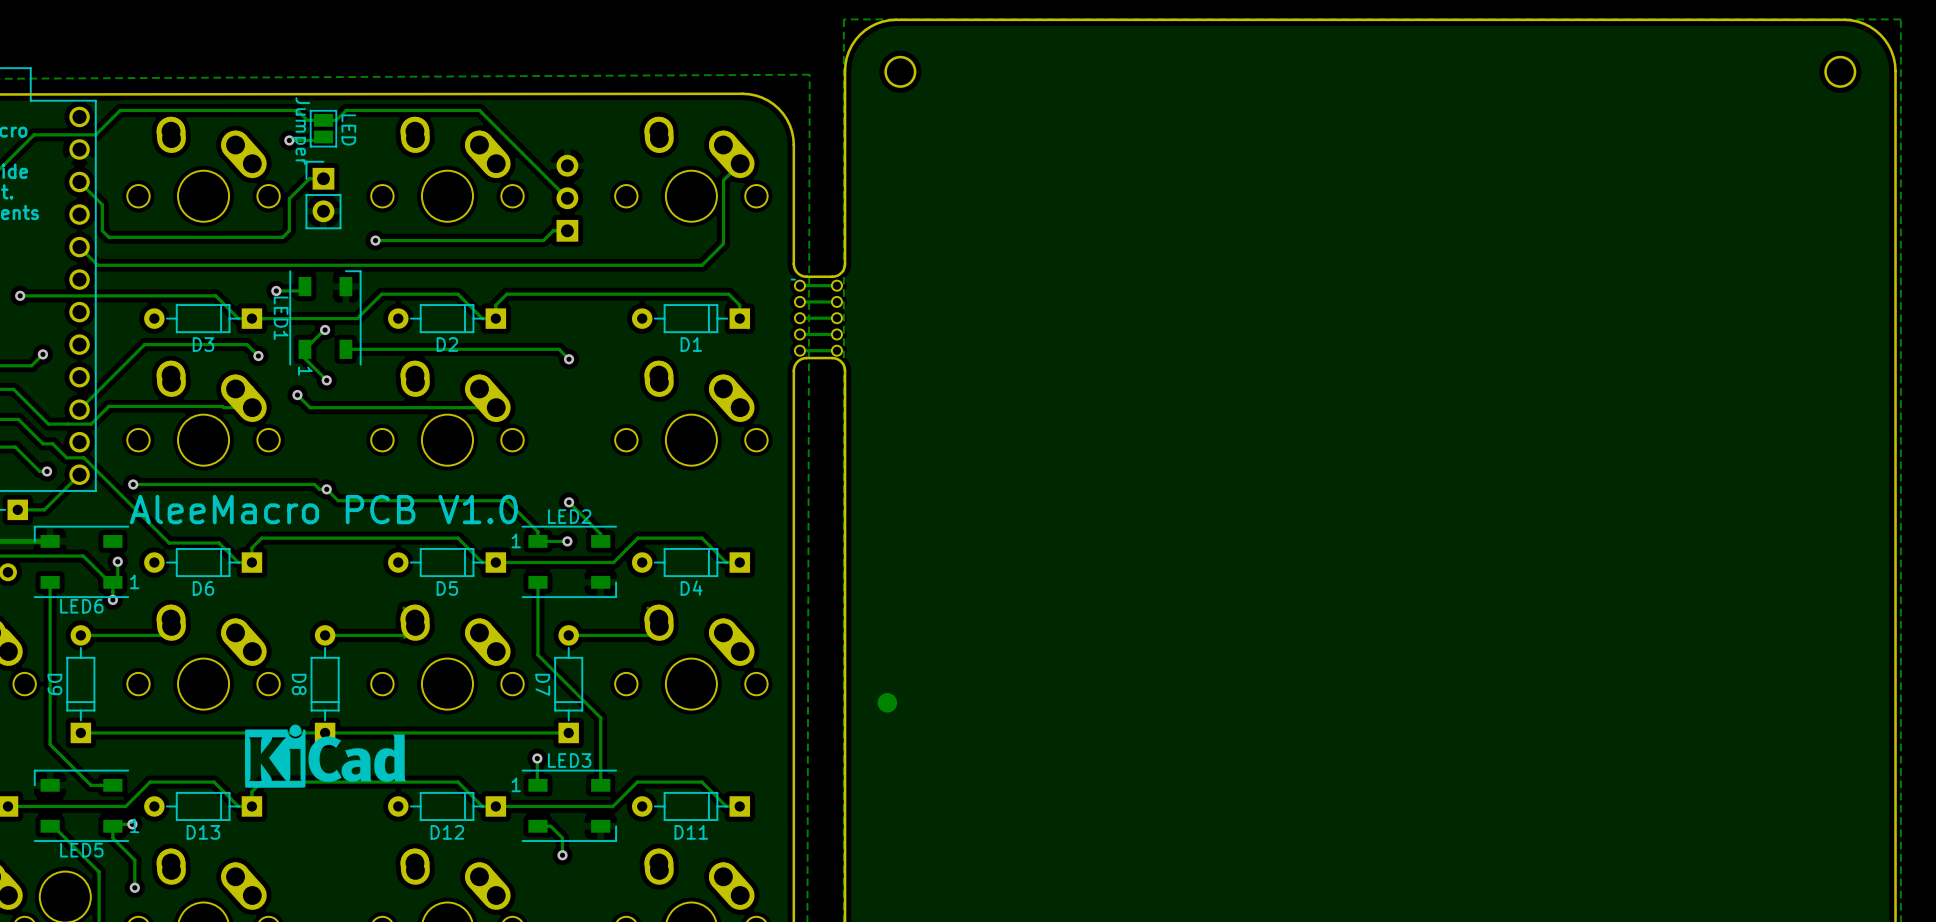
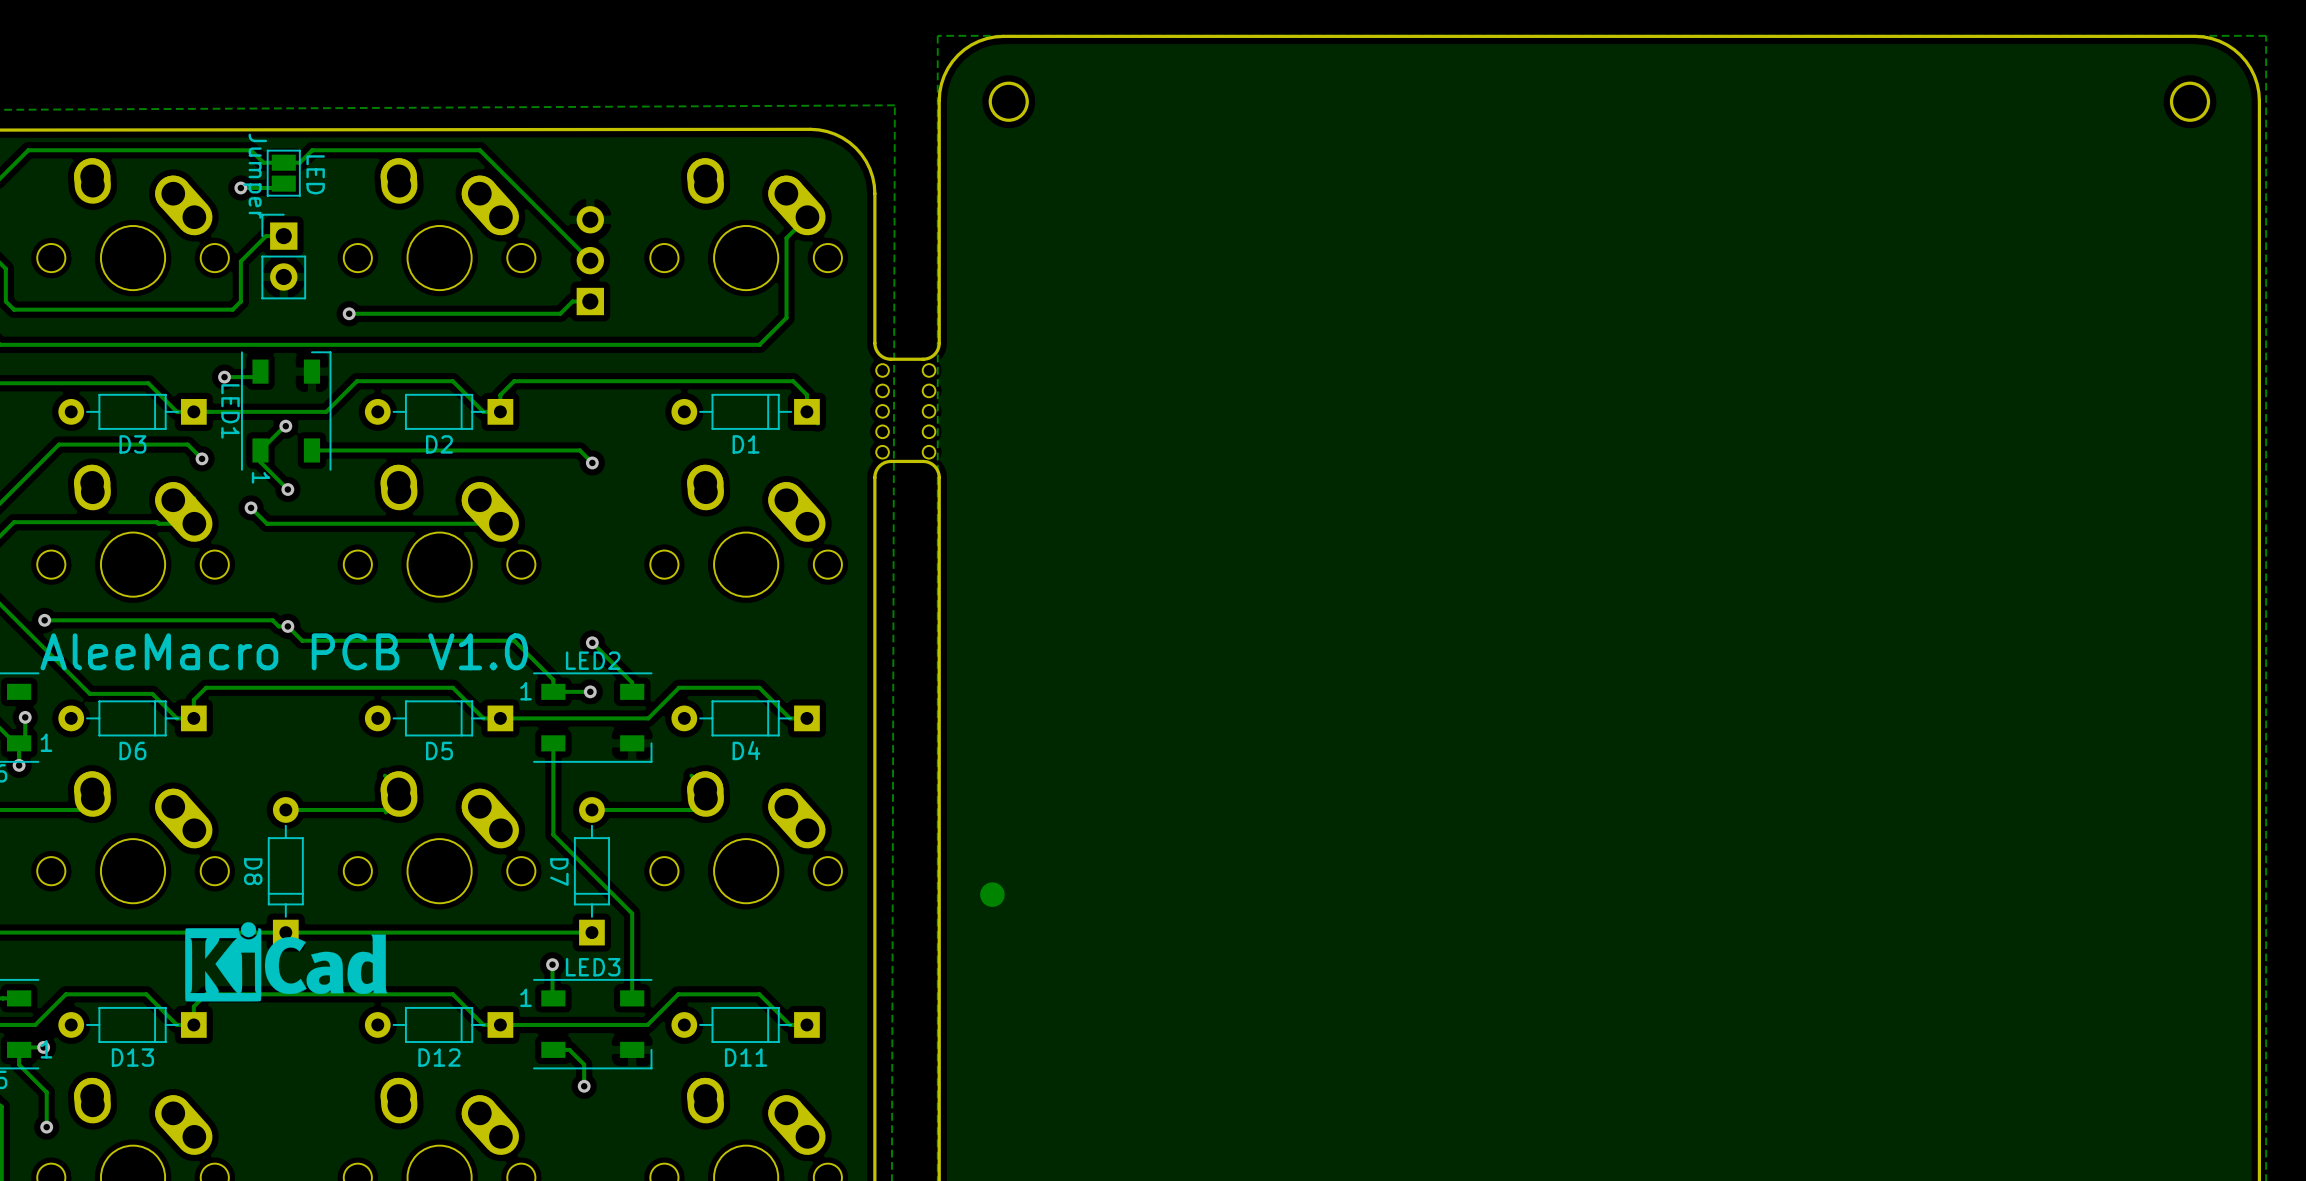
line: (795, 279) (791, 279) -> none
track: (836, 285) (799, 285) -> none
track: (836, 301) (799, 301) -> none
track: (836, 318) (799, 318) -> none
track: (836, 334) (799, 334) -> none
track: (836, 350) (799, 350) -> none

